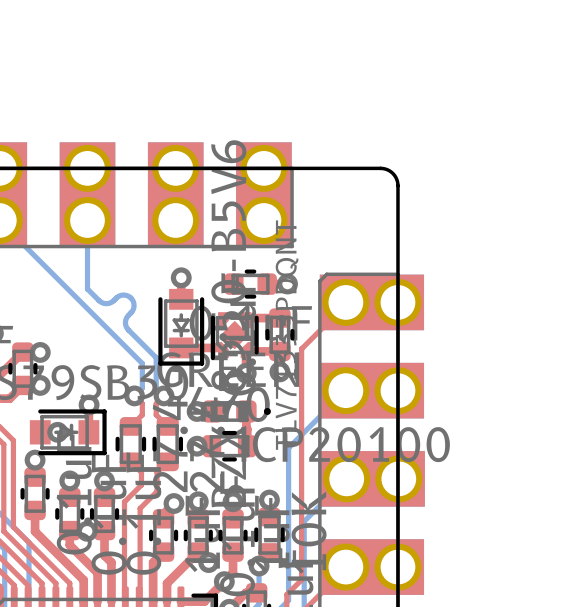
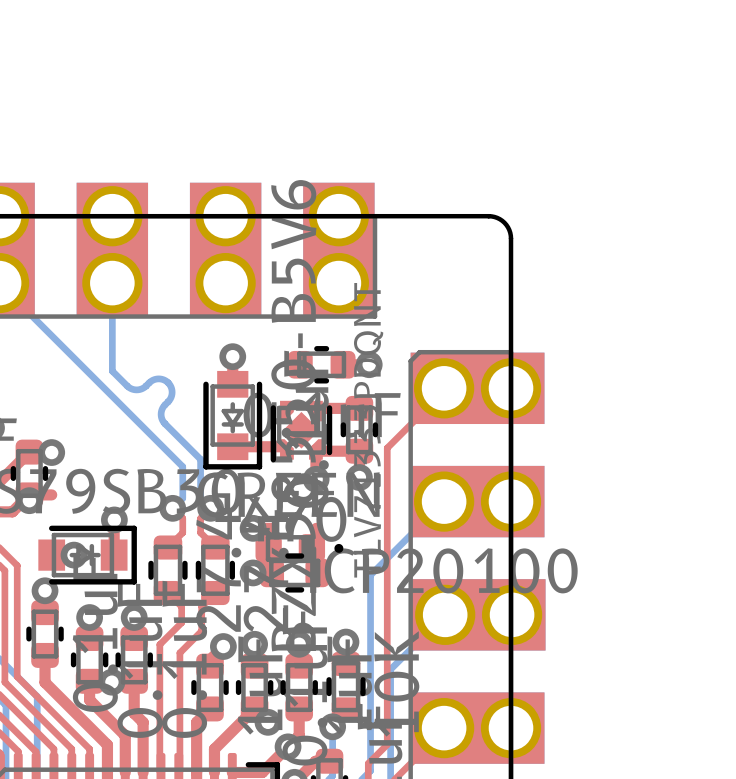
via position: (40, 385) -> (29, 500)
part position: (236, 411) -> (299, 548)

